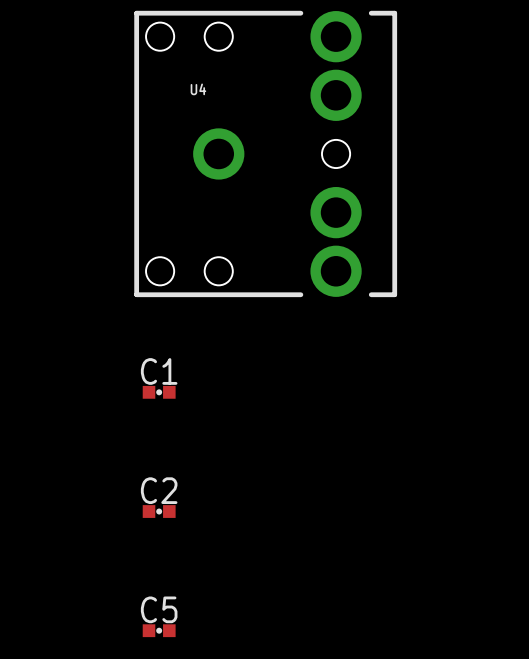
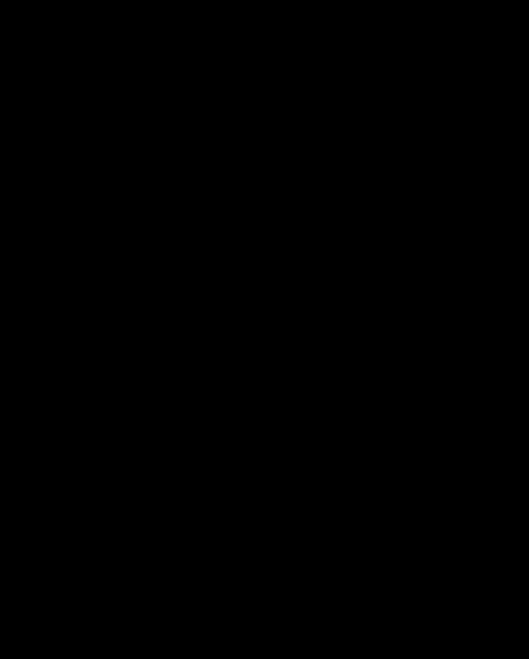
U4: (265, 153) -> none
C1: (159, 392) -> none
C2: (159, 511) -> none
C5: (159, 630) -> none

